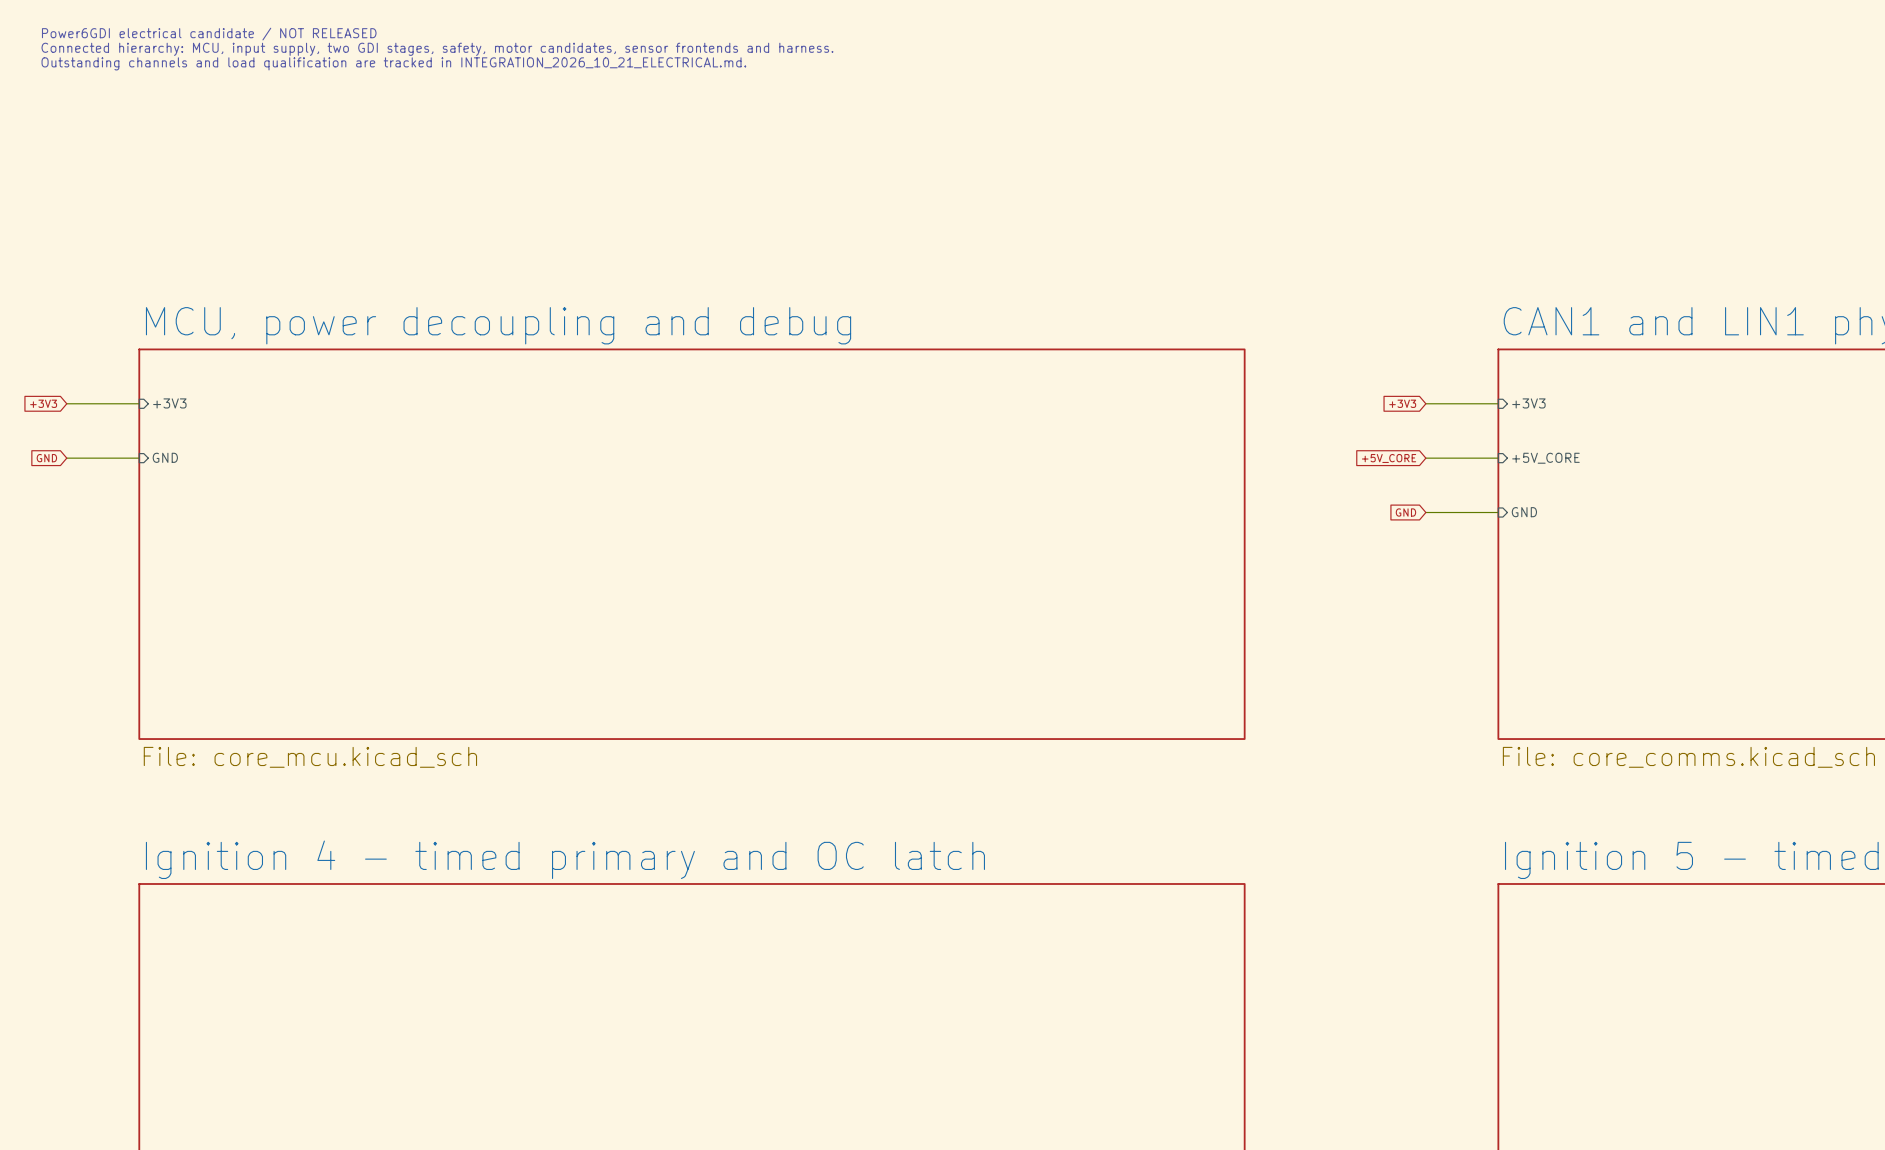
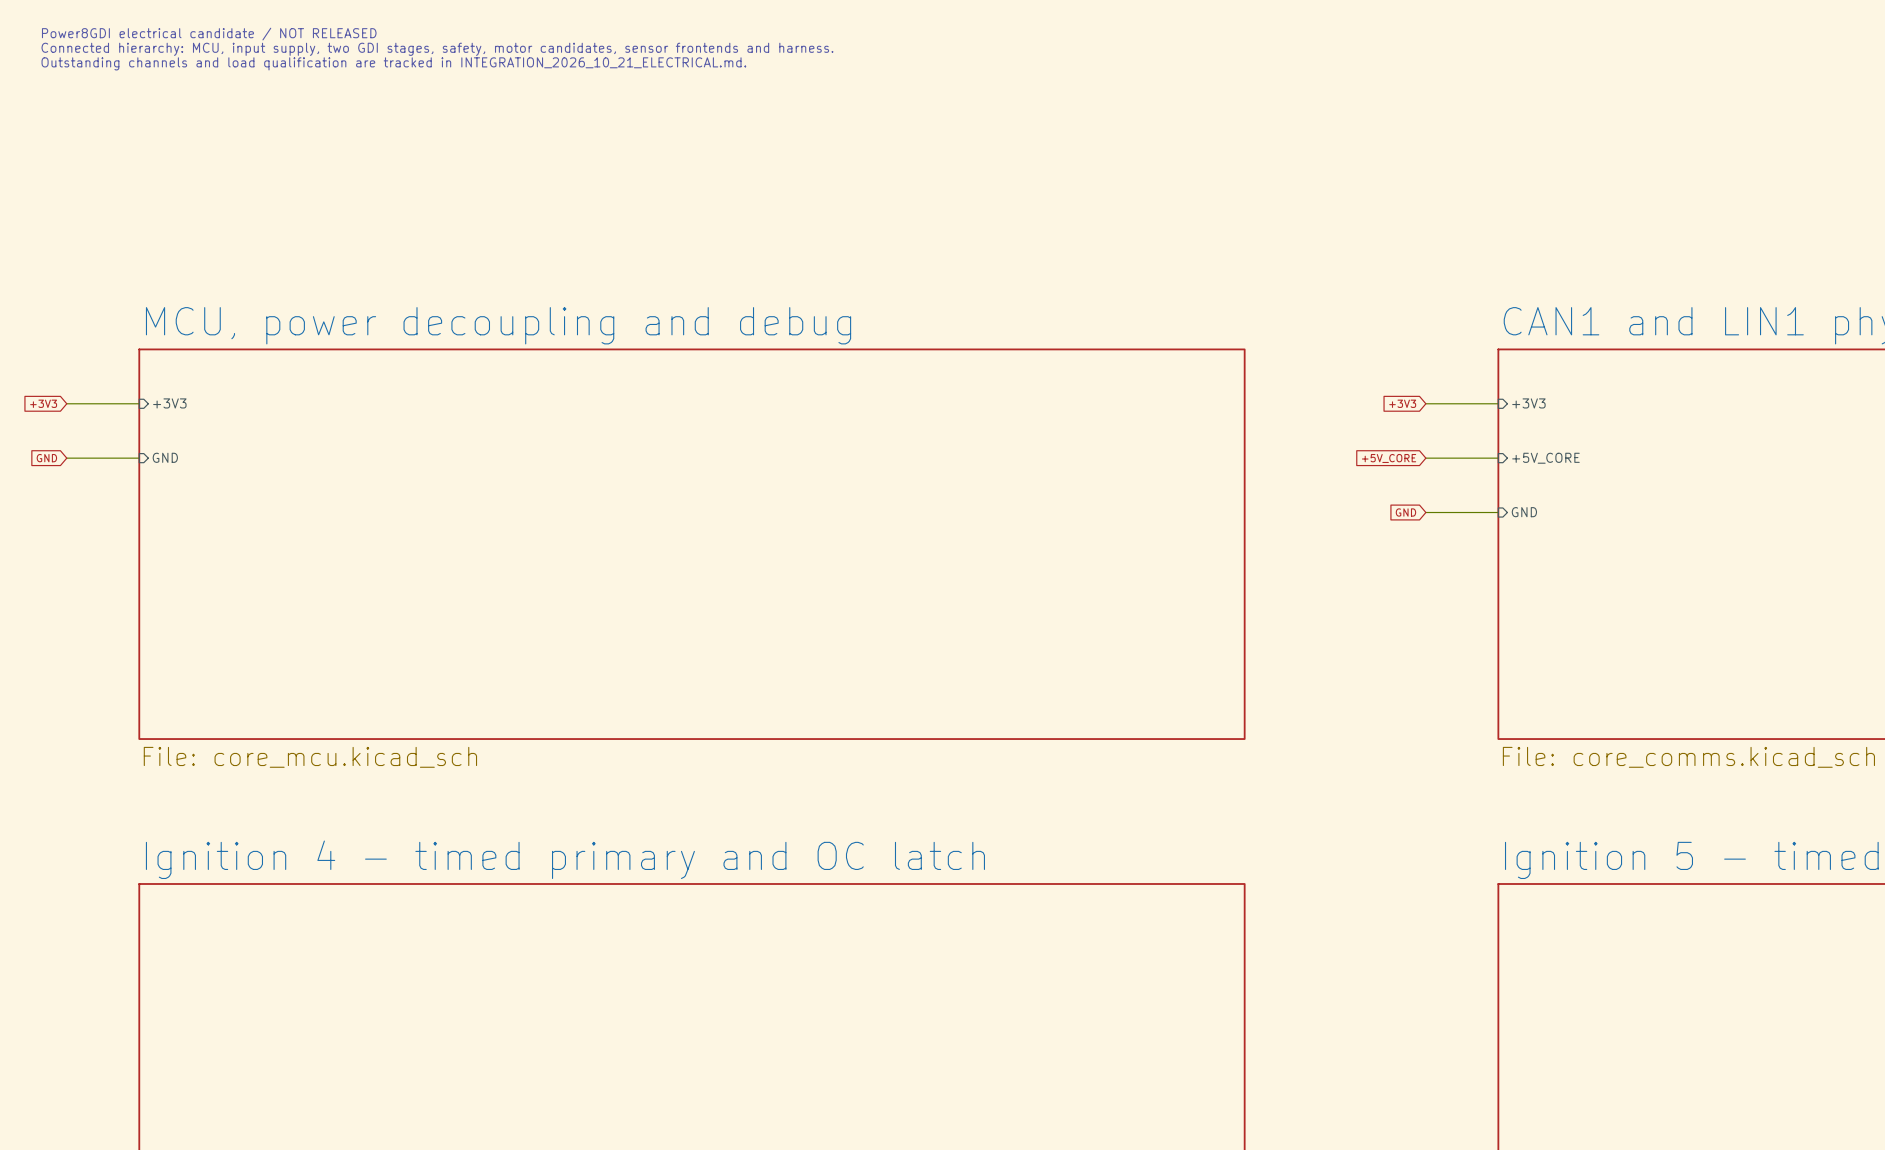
text: Power6GDI electrical candidate / NOT RELEASED (209, 34) -> Power8GDI electrical candidate / NOT RELEASED (209, 34)

